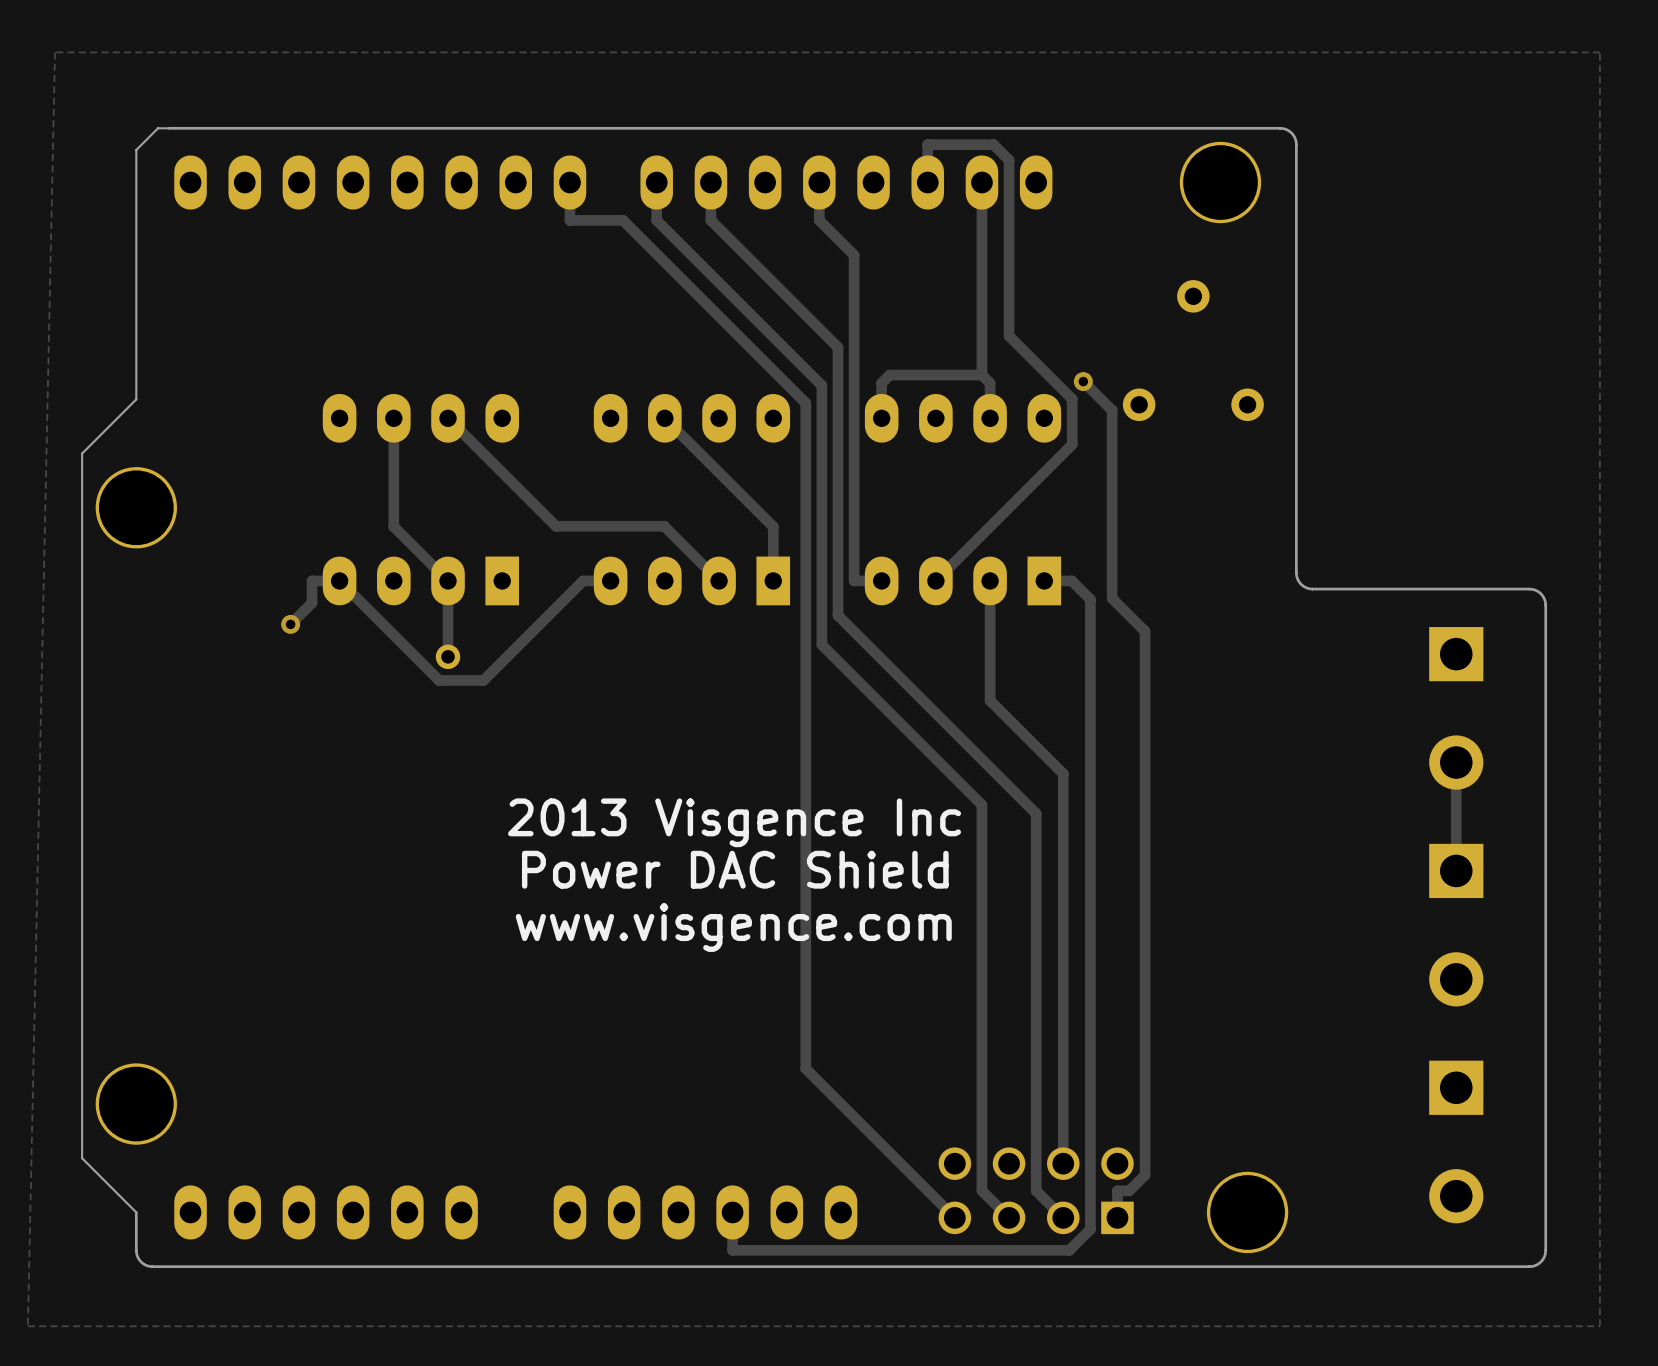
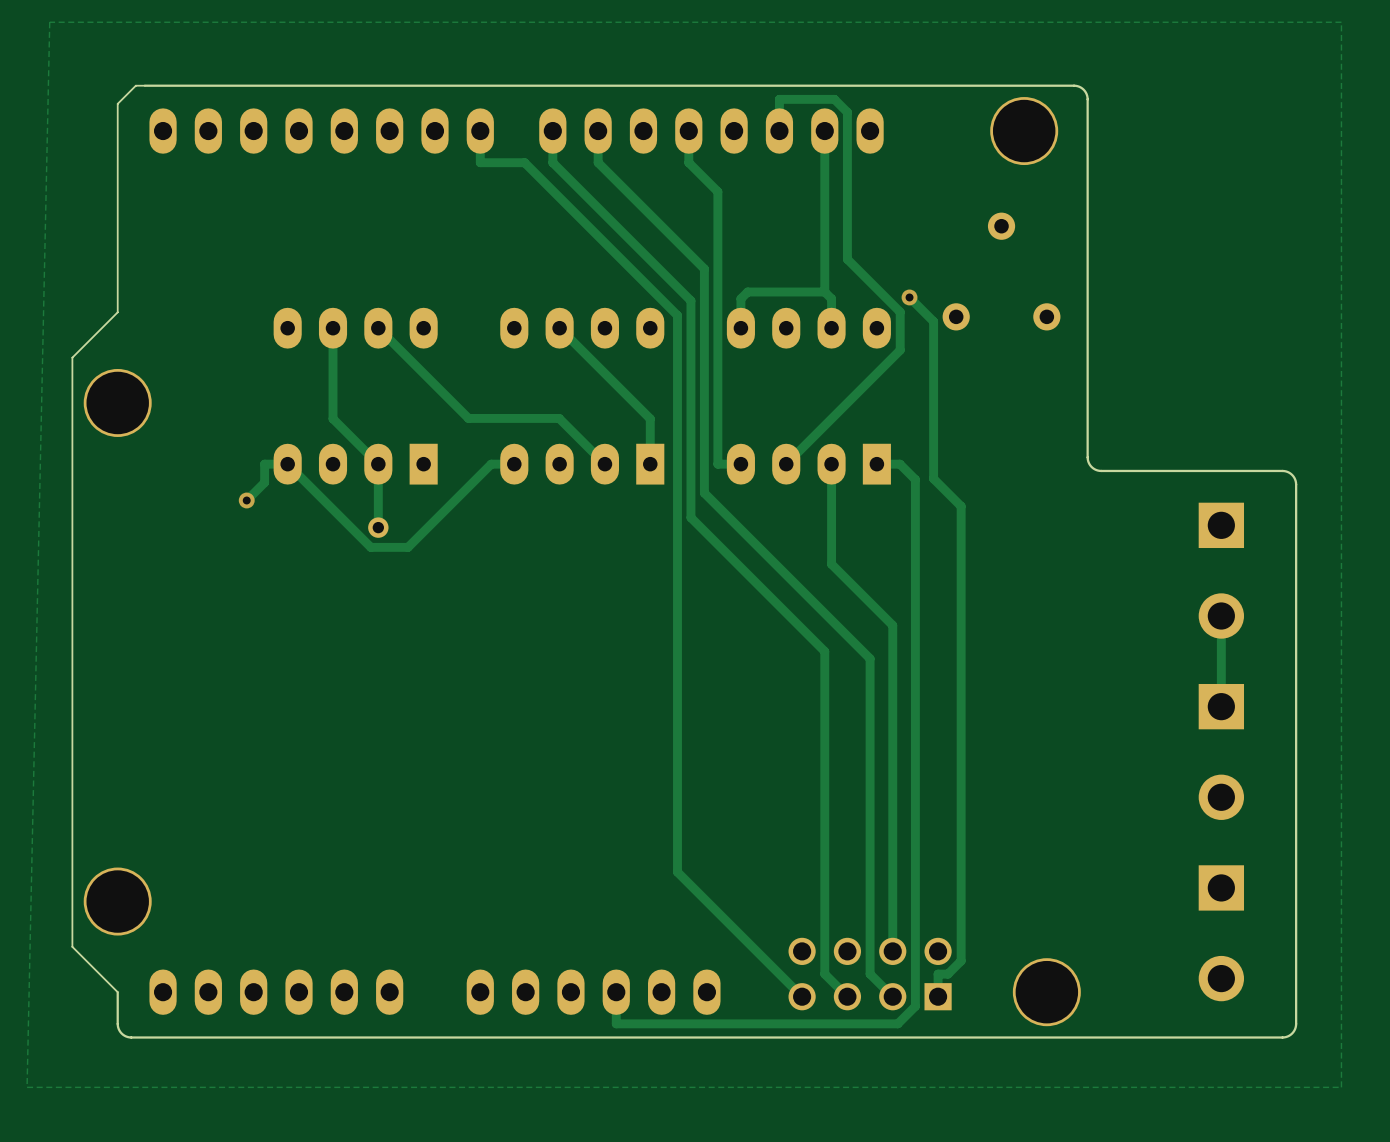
text: 2013 Visgence Inc (734, 822) -> none
text: Power DAC Shield (735, 869) -> none
text: www.visgence.com (733, 927) -> none

